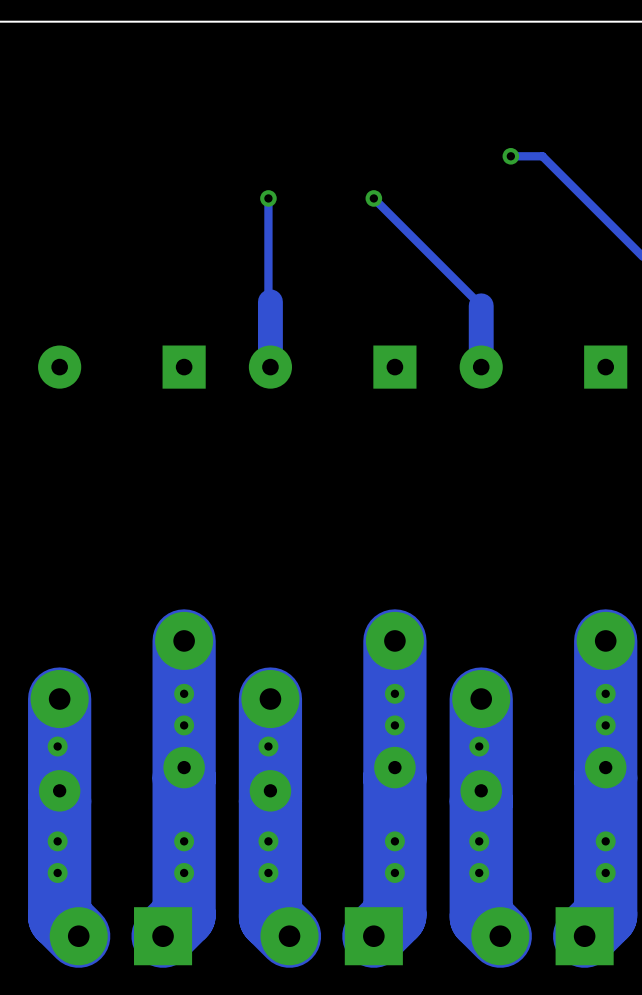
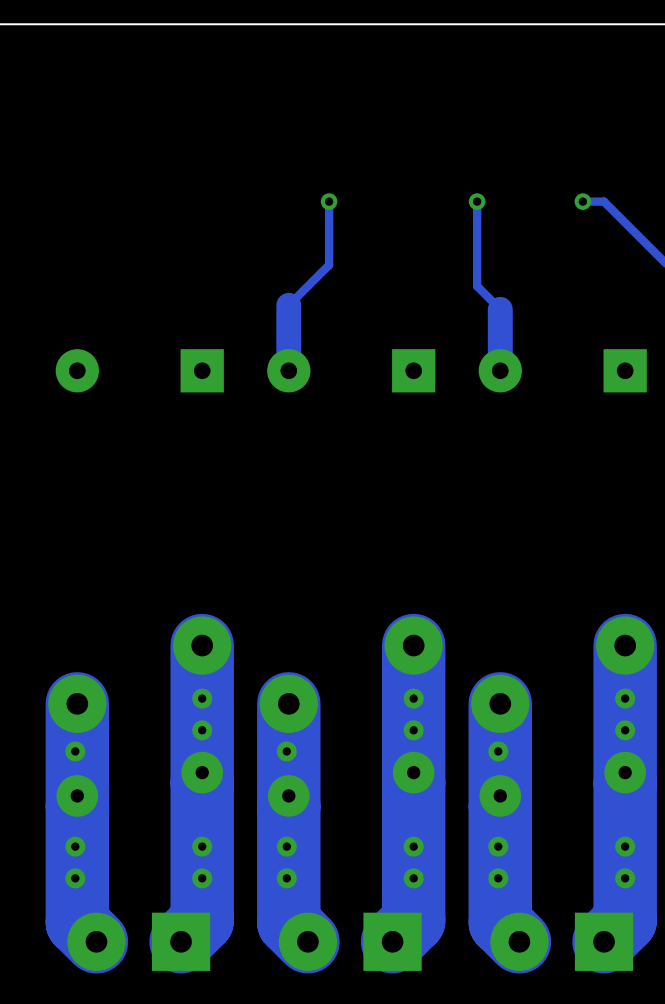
track: (510, 156) (542, 156) (584, 198) -> (582, 201) (604, 201)
via: (510, 156) -> none
track: (268, 198) (268, 299) (270, 301) -> (329, 201) (329, 265) (288, 305)
via: (268, 198) -> none
via: none -> (329, 201)
track: (373, 198) (458, 282) -> (477, 201) (477, 286)
via: (373, 198) -> none
via: none -> (477, 201)
via: none -> (582, 201)

